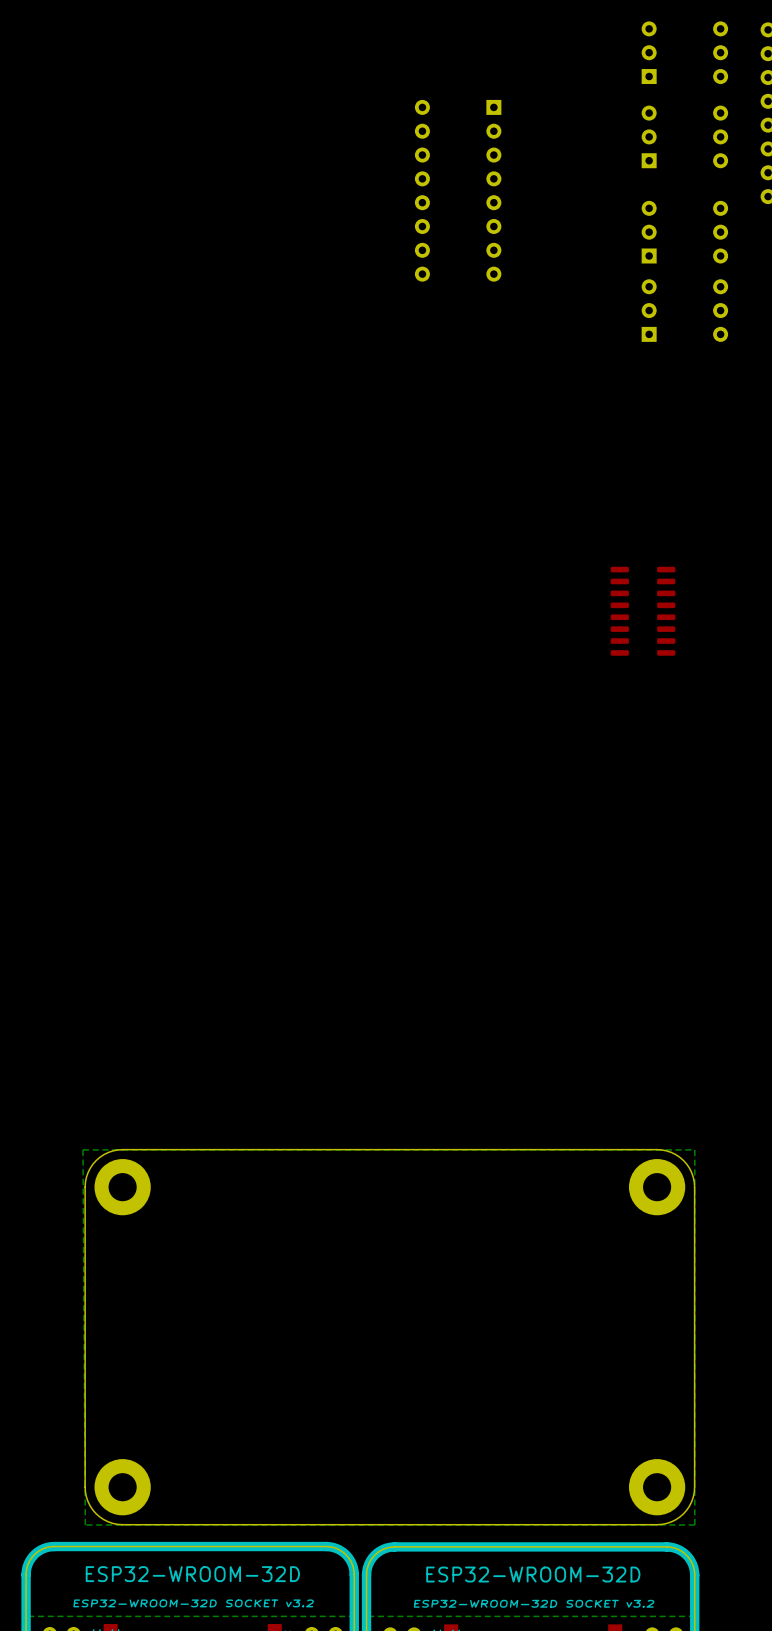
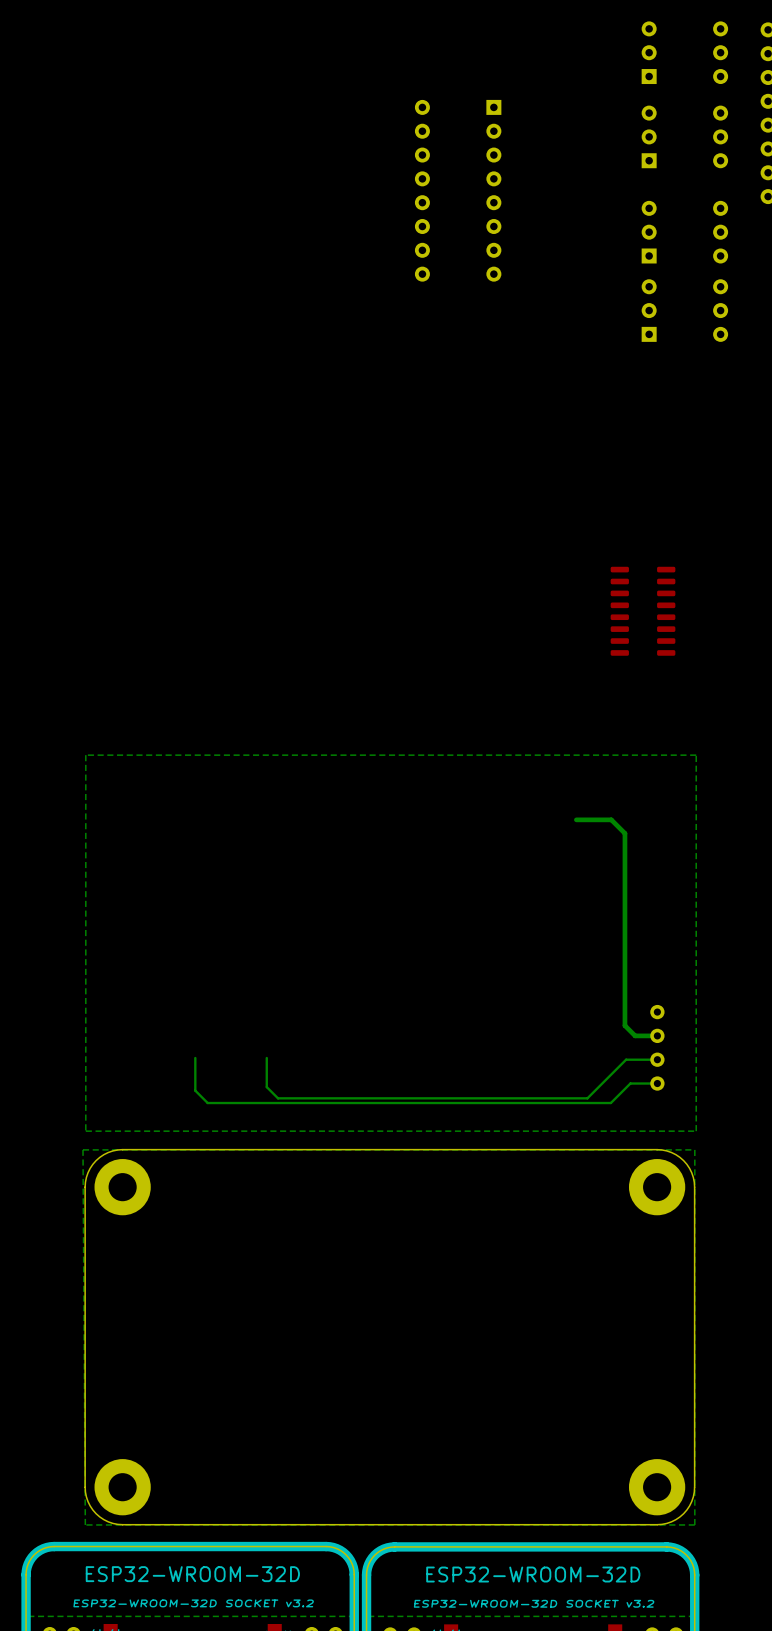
bottom zone outline: none -> (696, 755) (85, 755) (85, 1131) (696, 1131) (696, 755)
bottom track: none -> (576, 819) (611, 819) (624, 833) (624, 1025) (635, 1035) (657, 1035)
part: none -> (657, 1047)
bottom track: none -> (195, 1058) (195, 1090) (207, 1103) (610, 1103) (630, 1083) (657, 1083)
bottom track: none -> (266, 1058) (266, 1087) (278, 1098) (587, 1098) (626, 1059) (657, 1059)

